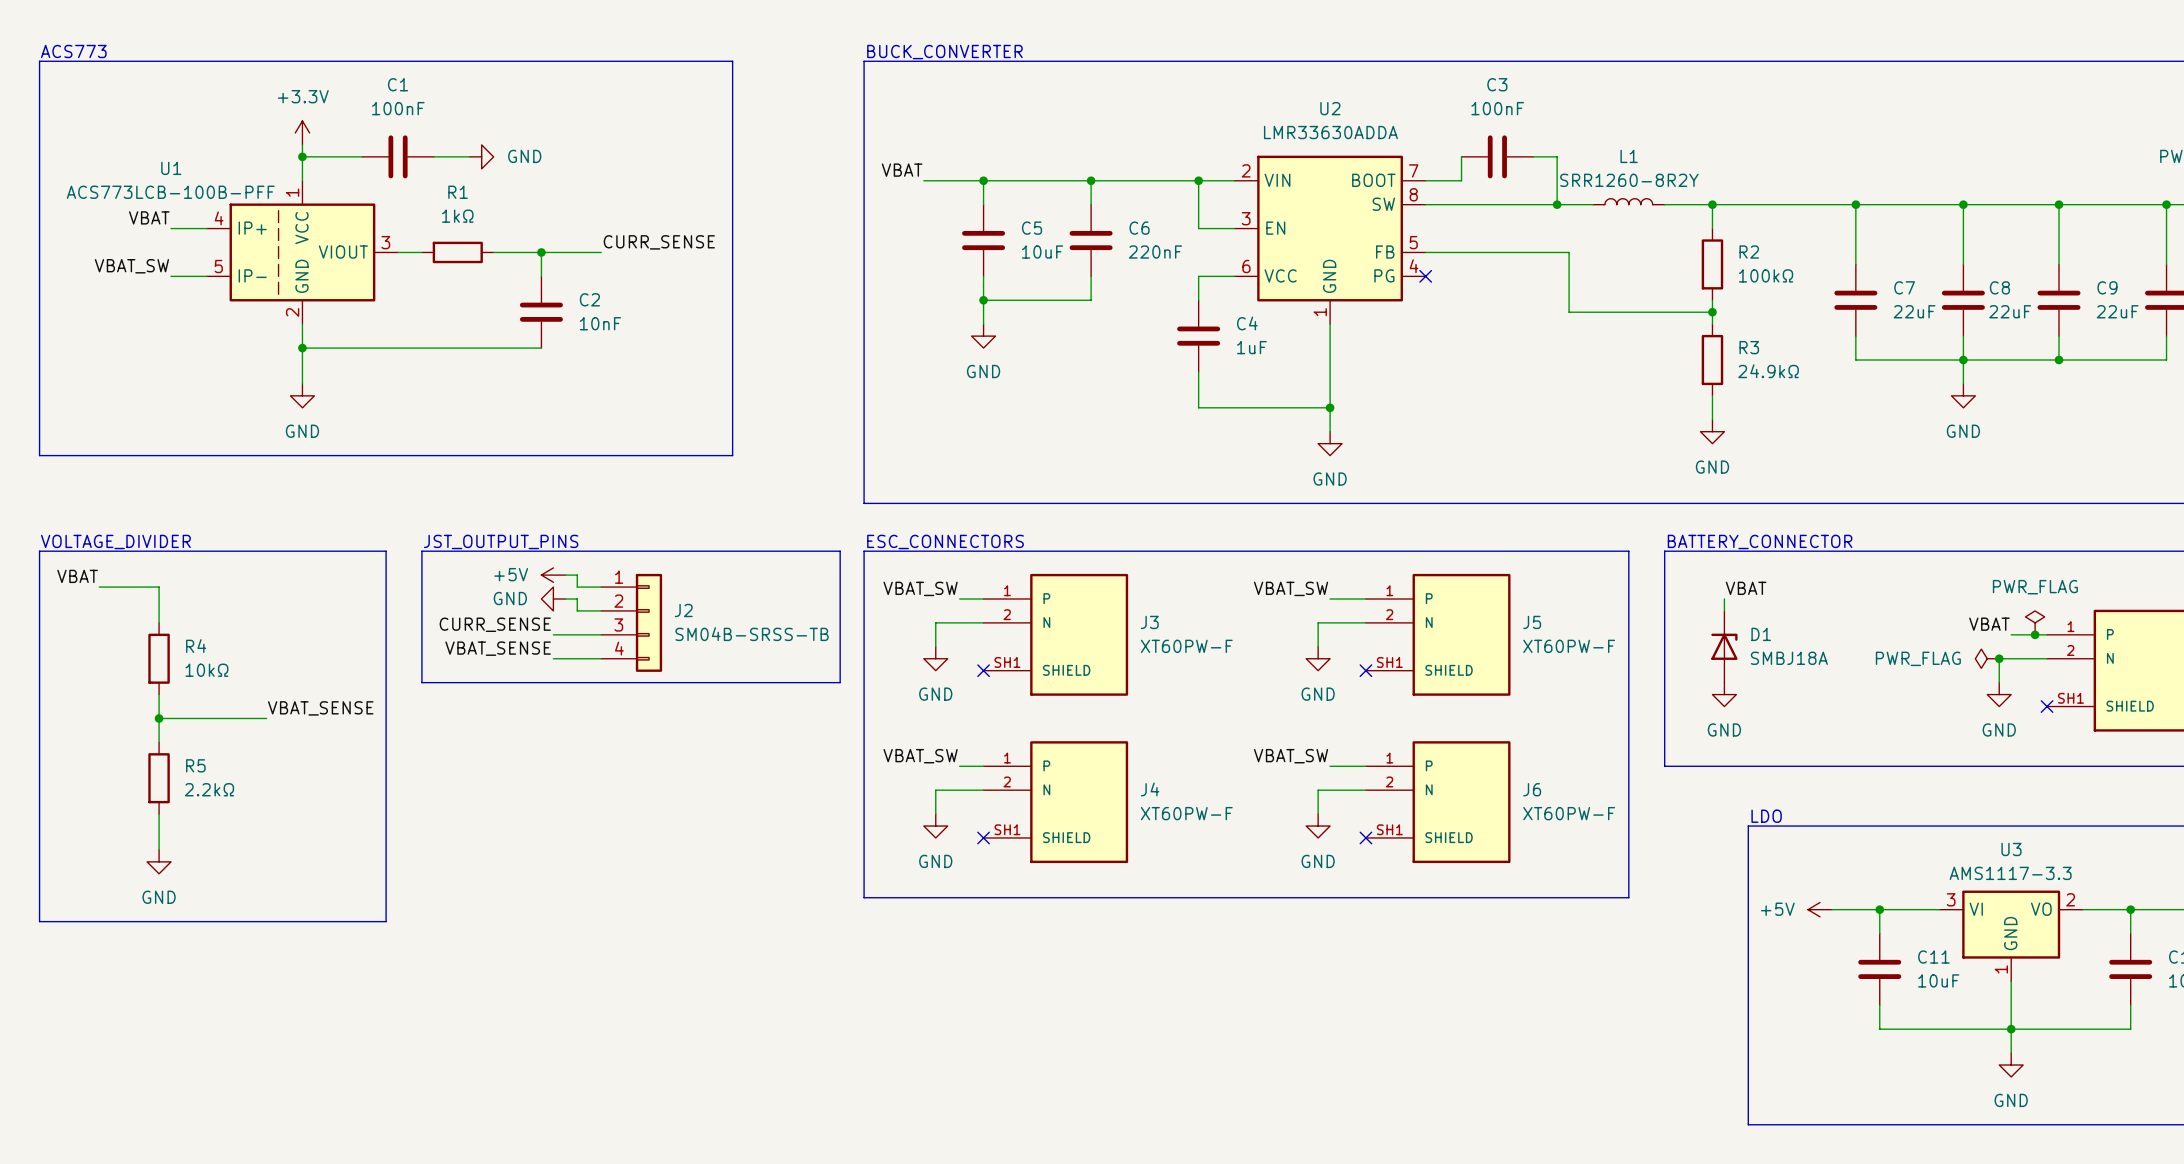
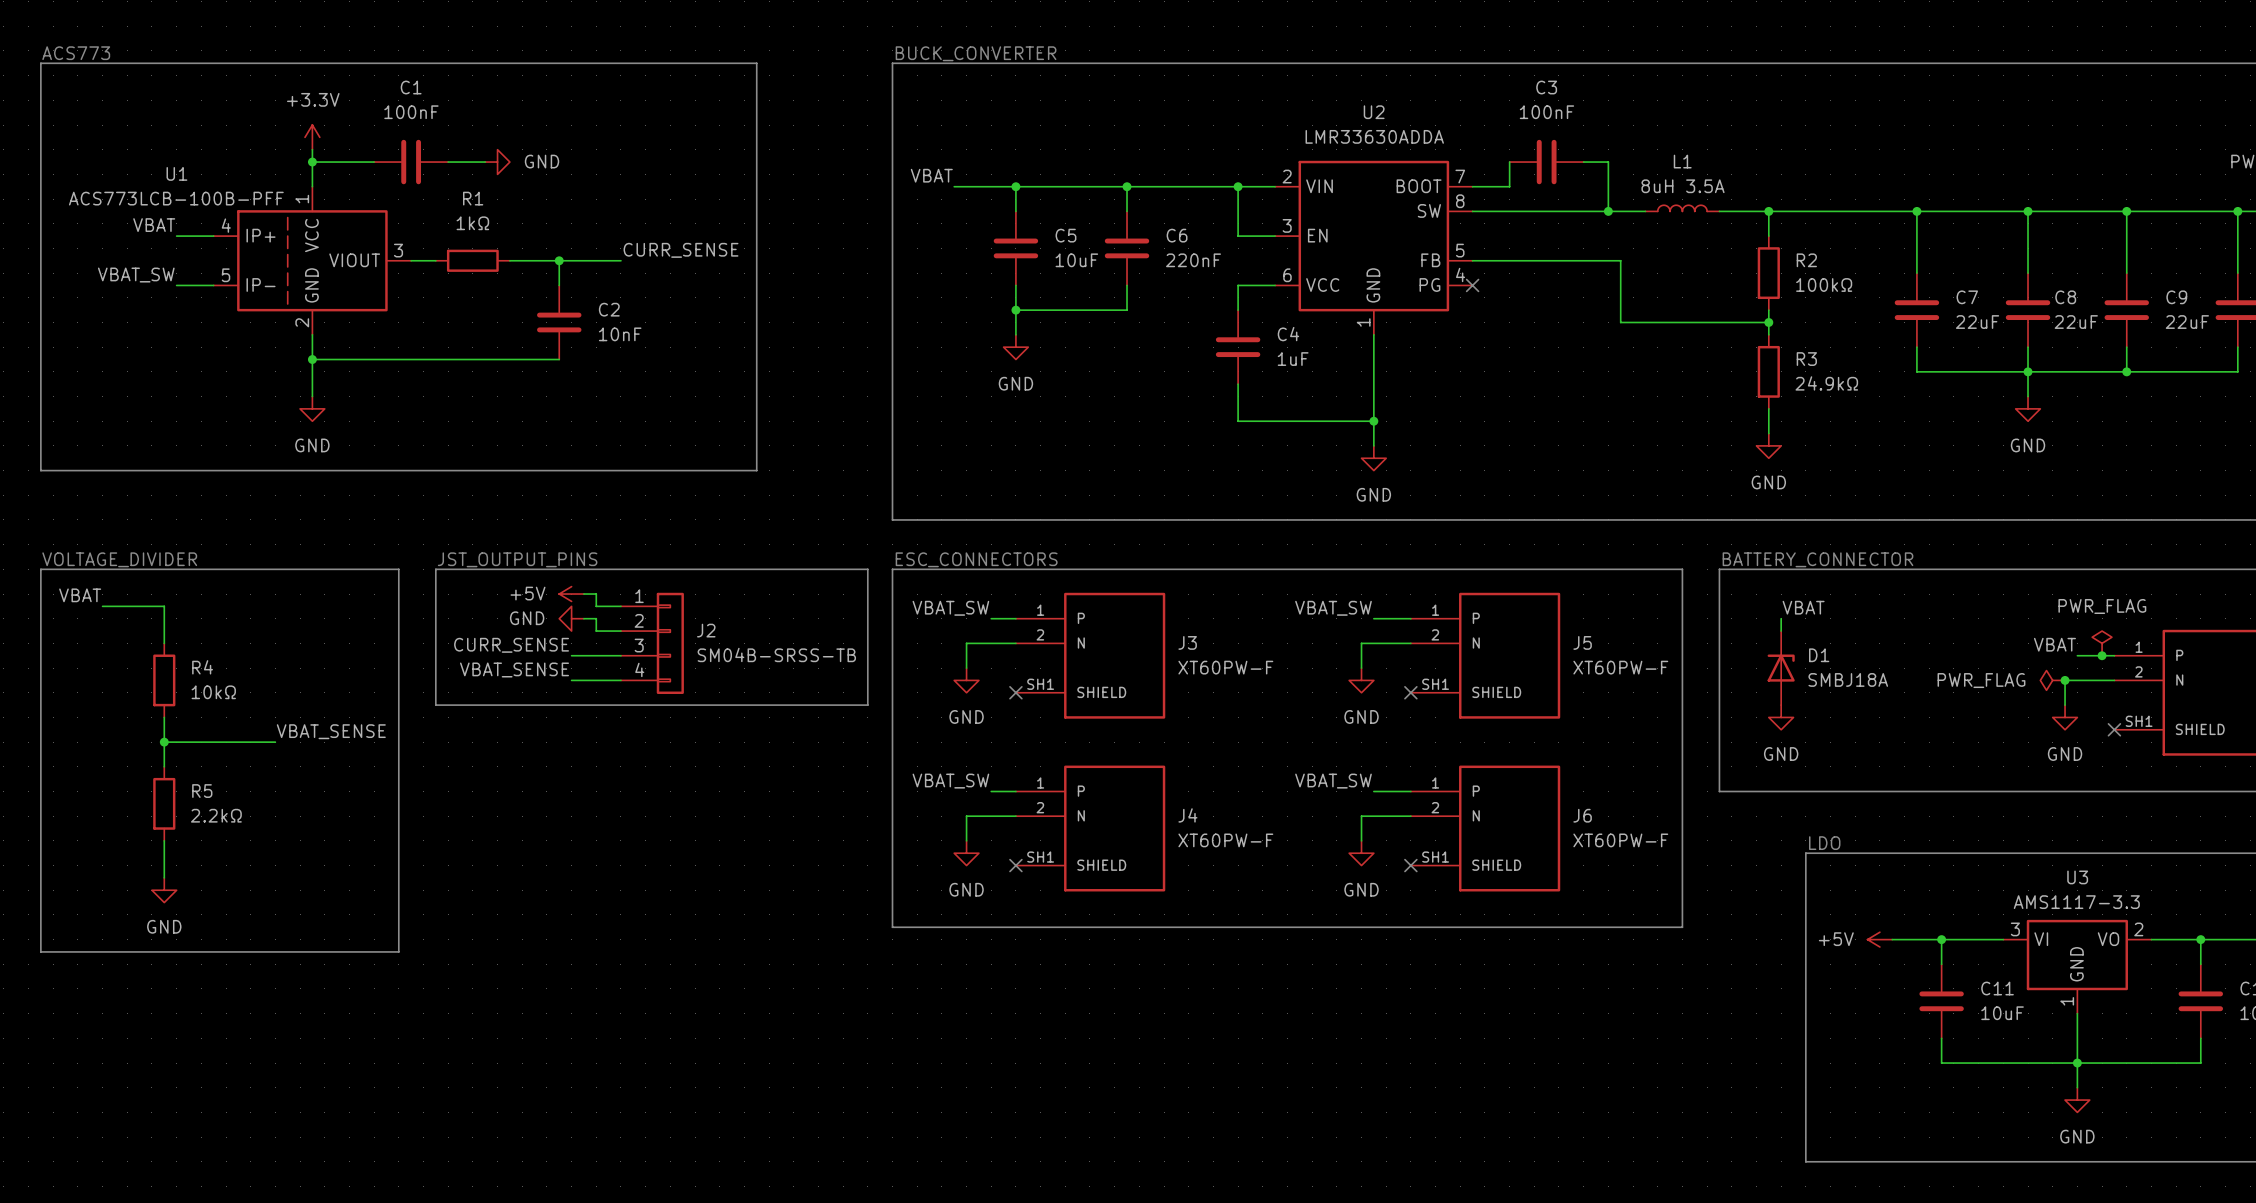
L1 value: SRR1260-8R2Y (1629, 180) -> 8uH 3.5A (1683, 186)

